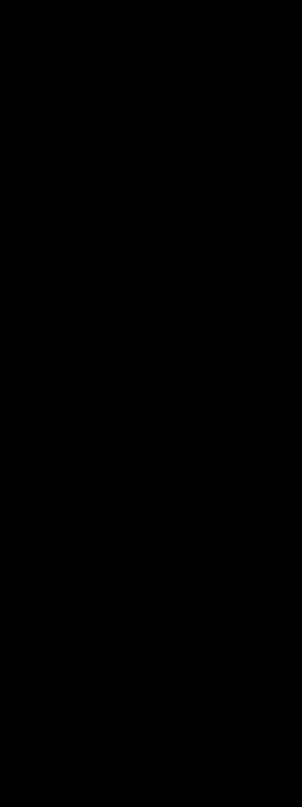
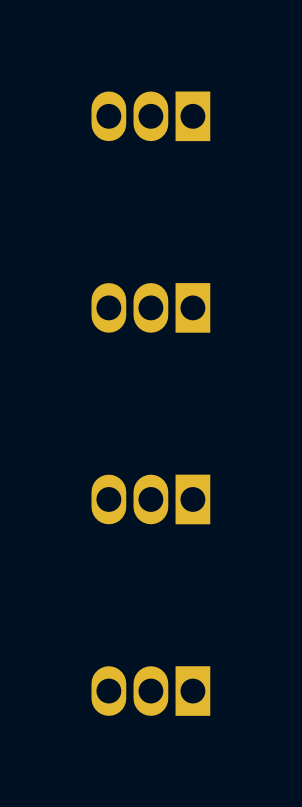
part: none -> (150, 116)
part: none -> (150, 307)
part: none -> (150, 499)
part: none -> (150, 691)

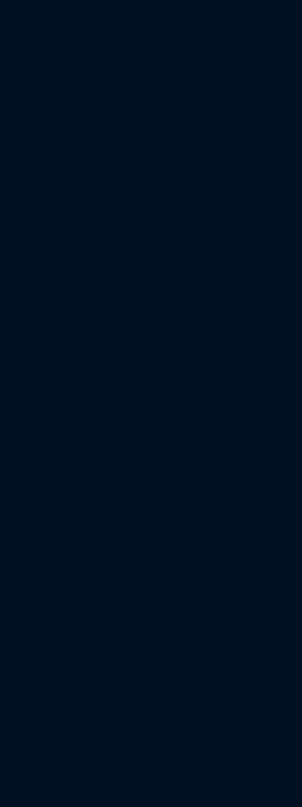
part: (150, 116) -> none
part: (150, 307) -> none
part: (150, 499) -> none
part: (150, 691) -> none

